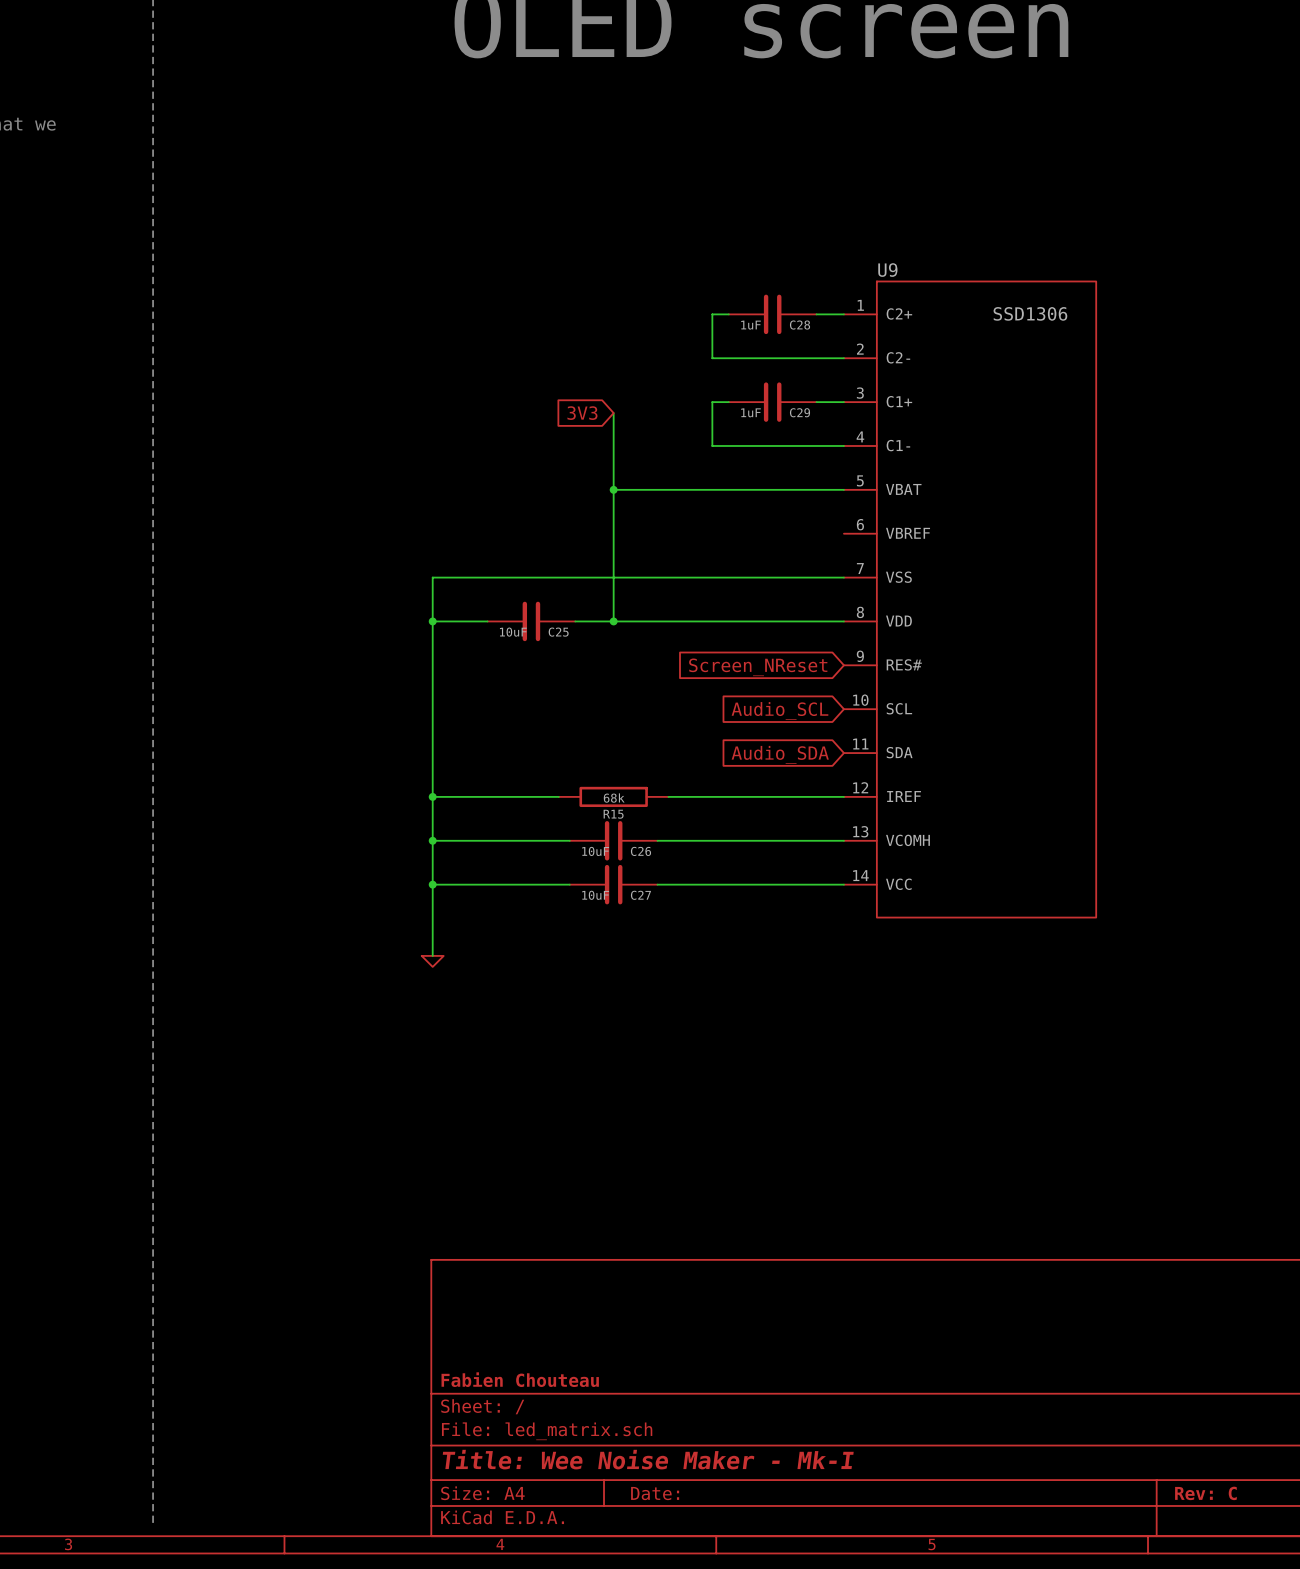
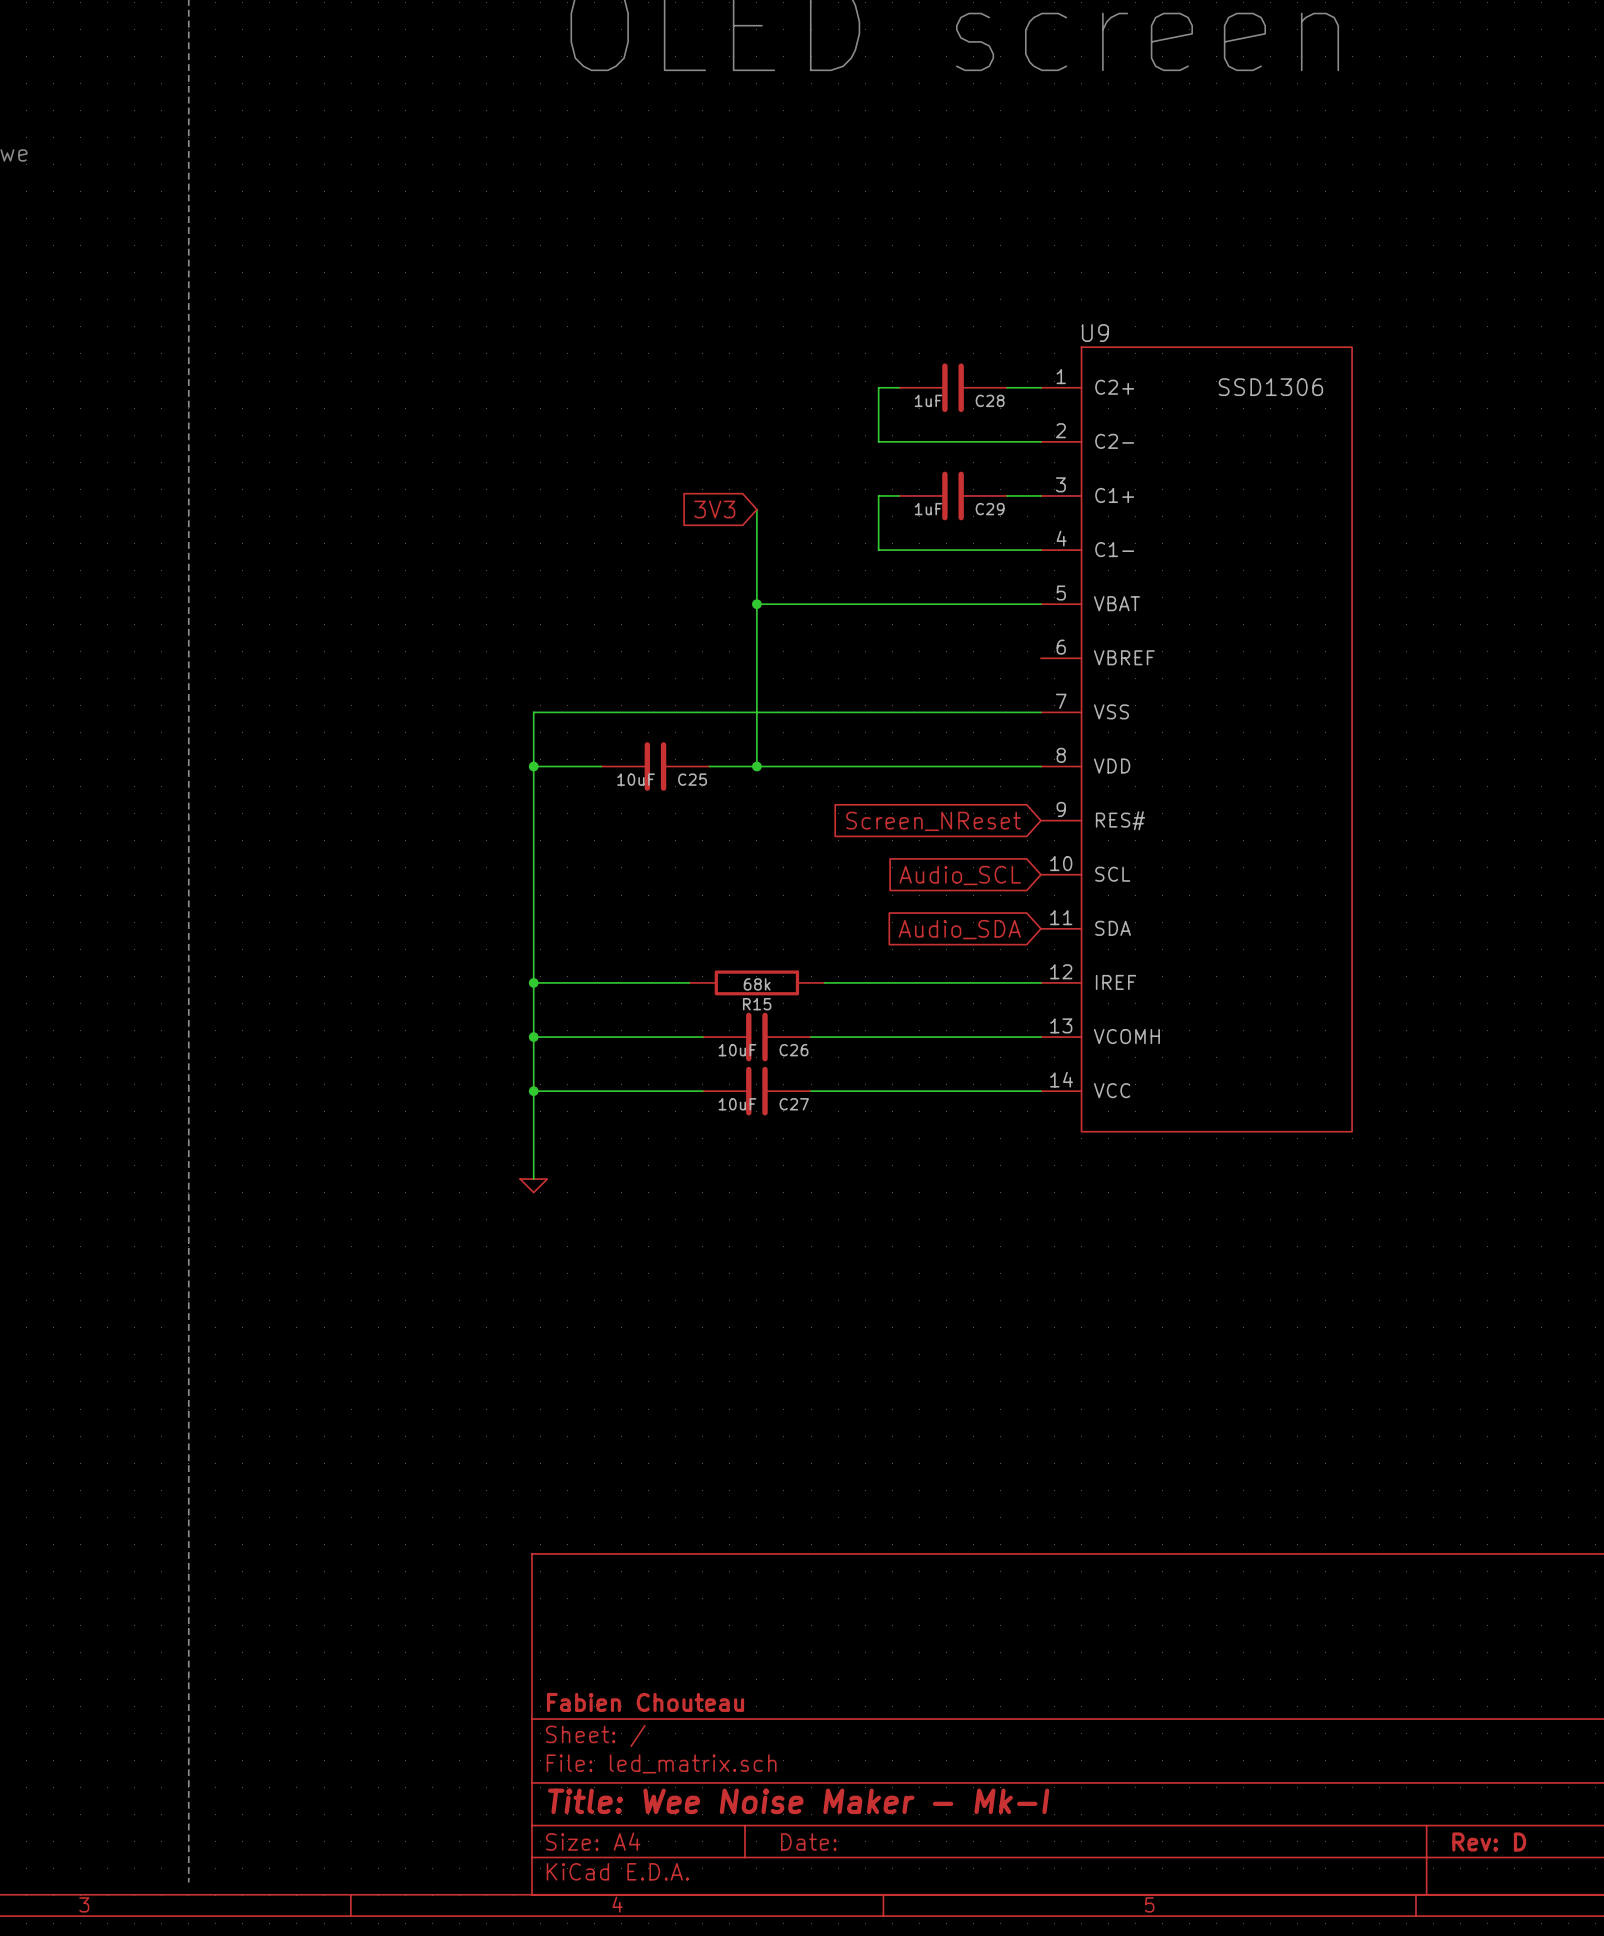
title block: Rev: C (1205, 1493) -> Rev: D (1489, 1841)

